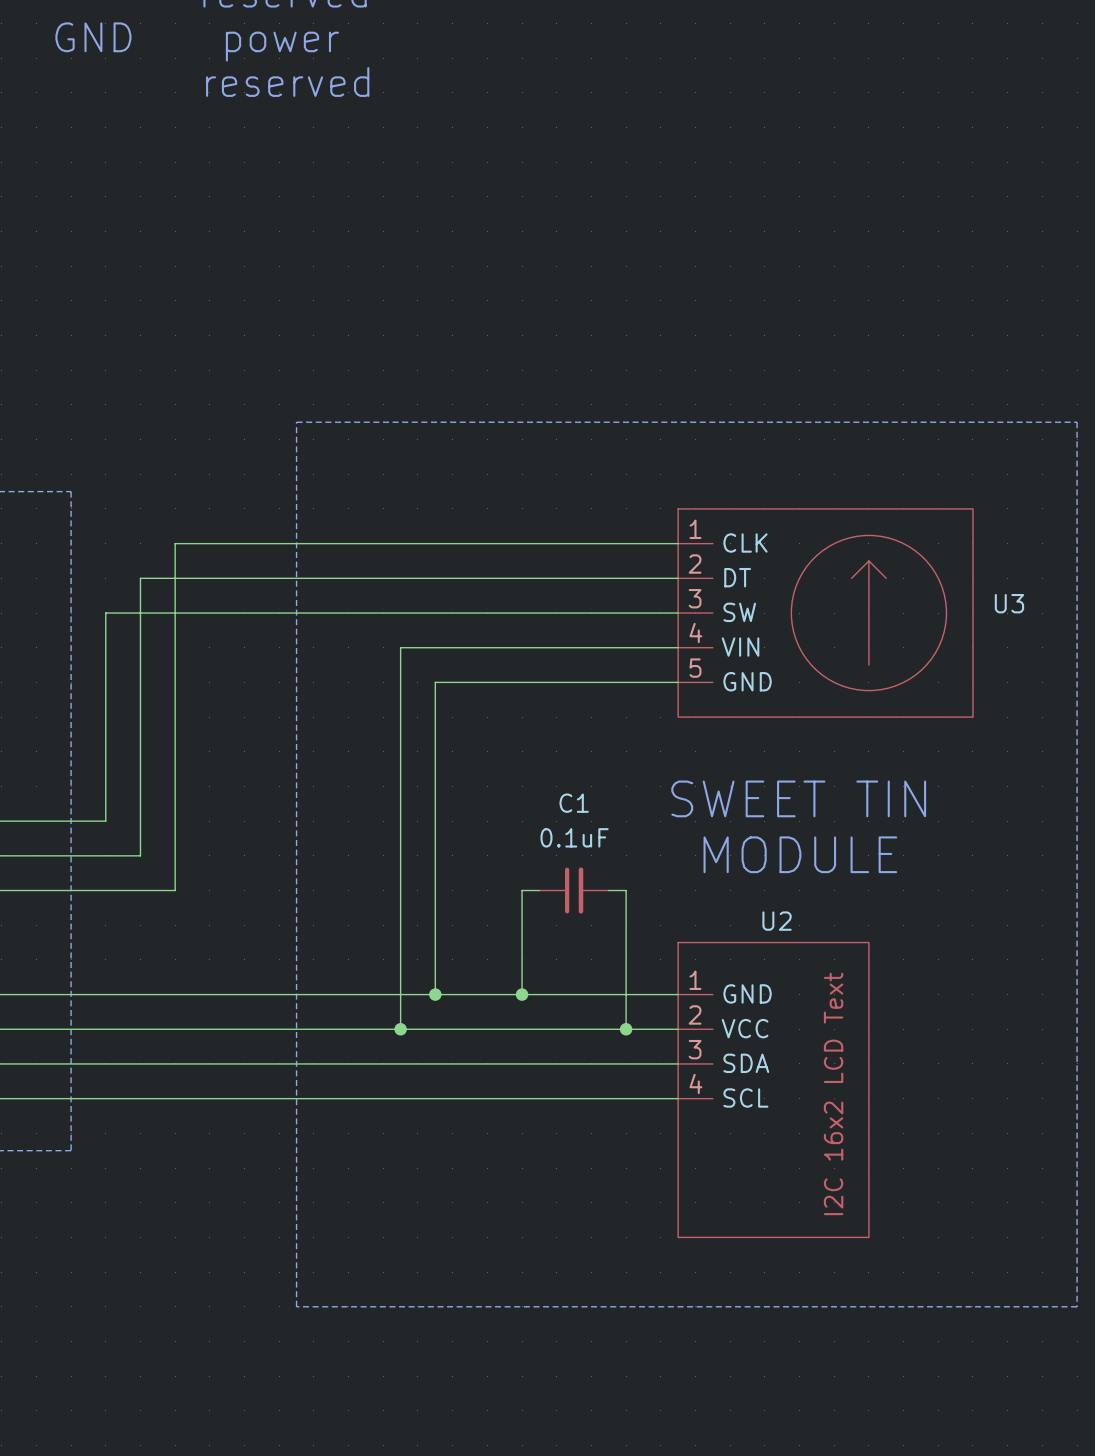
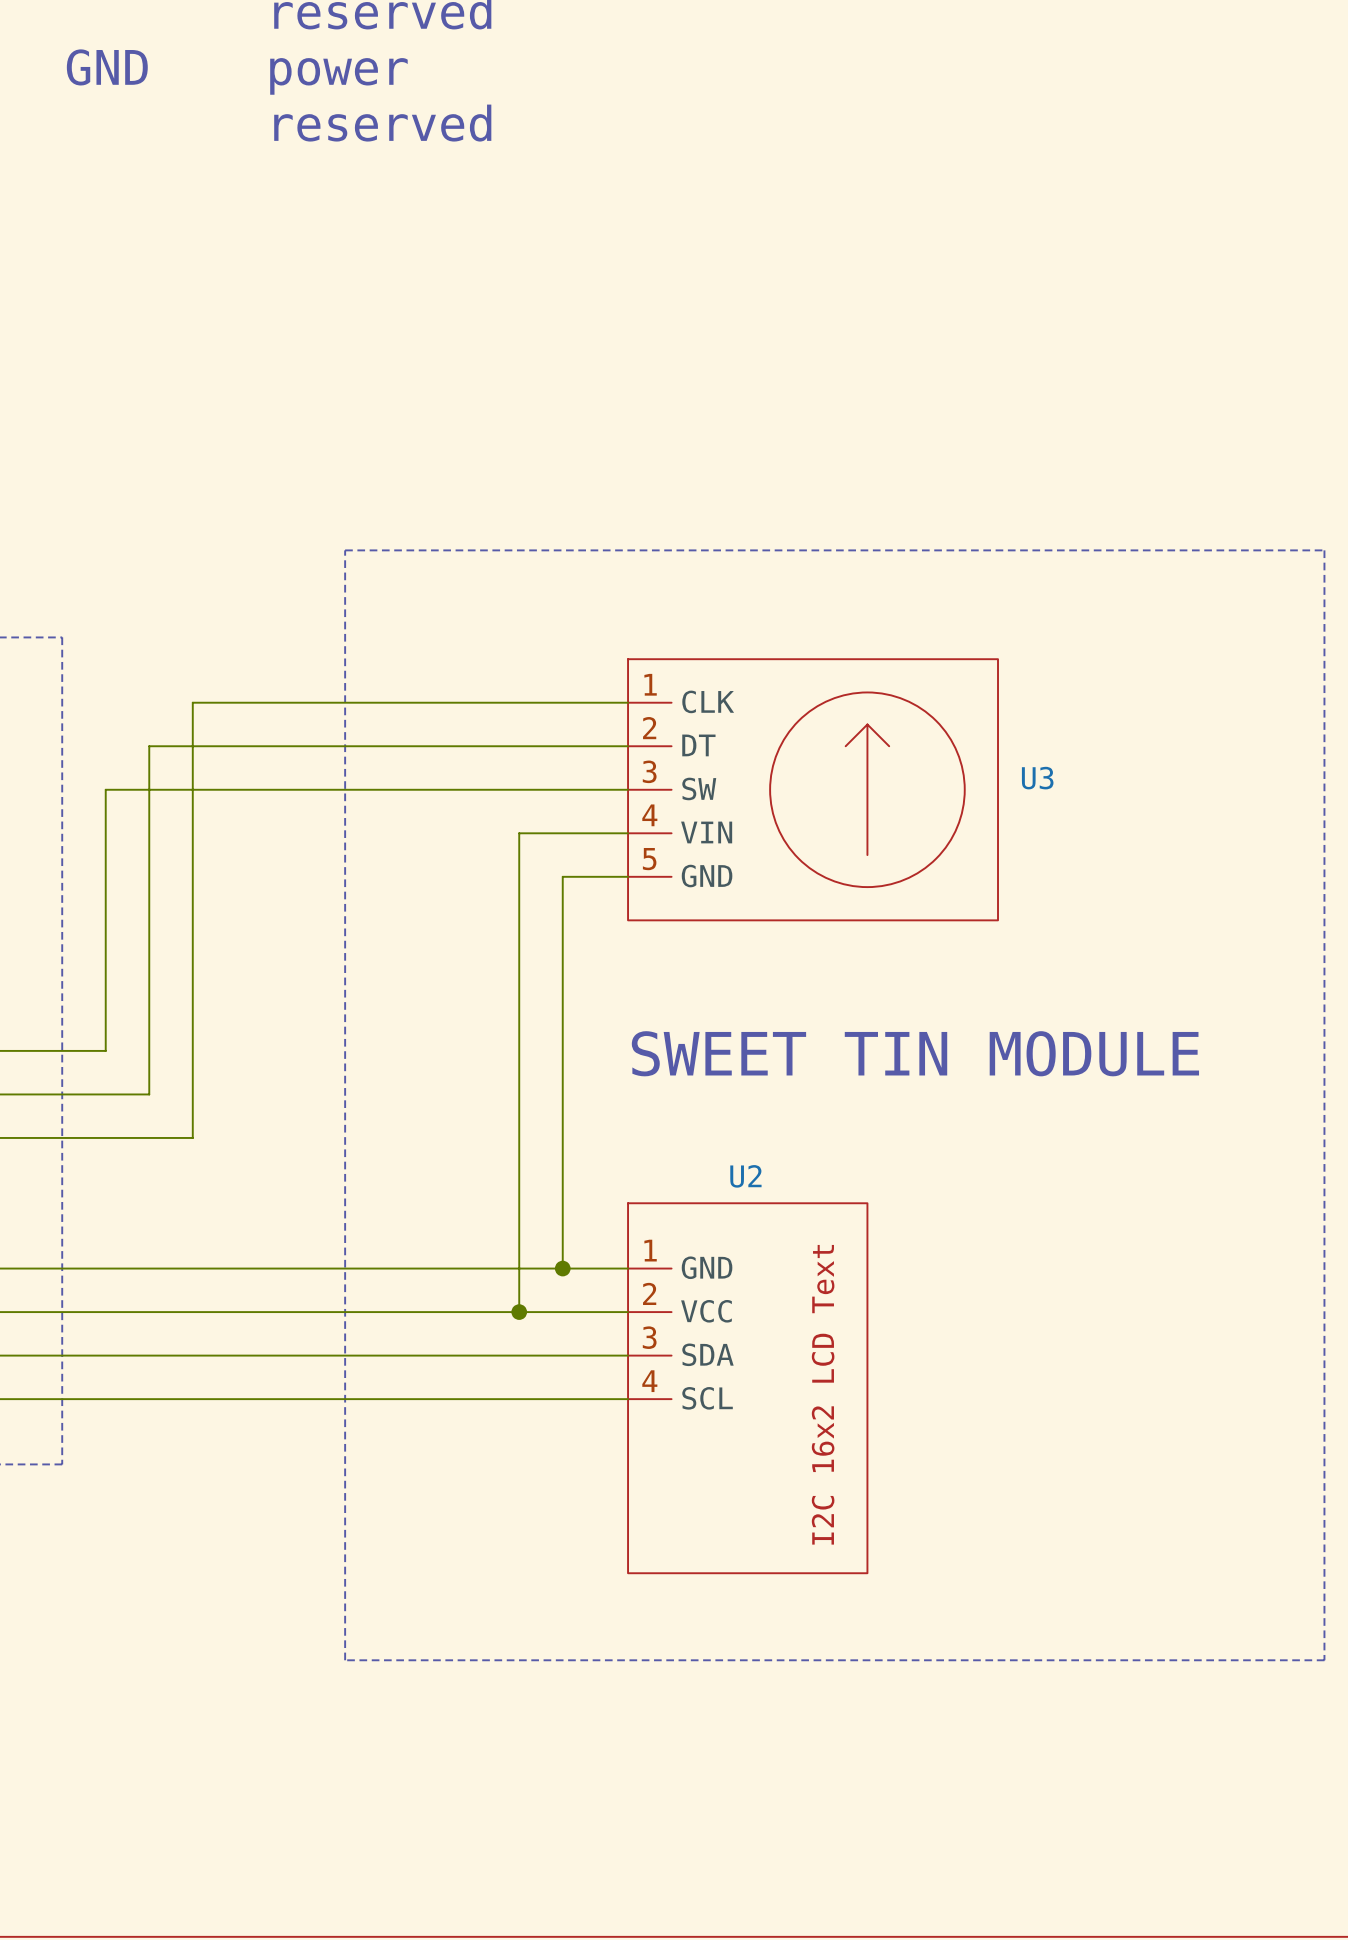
wire: (522, 543) (678, 543) -> none
wire: (522, 578) (678, 578) -> none
wire: (522, 613) (678, 613) -> none
U3 position: (825, 613) -> (813, 789)
wire: (435, 647) (400, 647) (400, 1029) -> none
wire: (522, 647) (678, 647) -> none
wire: (435, 682) (470, 682) -> (519, 876) (519, 833)
wire: none -> (562, 876) (562, 1268)
wire: (522, 682) (678, 682) -> none
text: SWEET TIN (798, 798) -> SWEET TIN MODULE (915, 1053)
text: MODULE (800, 854) -> none
wire: (539, 890) (522, 890) (522, 994) (678, 994) -> none
C1: 0.1uF (574, 890) -> none
wire: (608, 890) (626, 890) (626, 1029) -> none
wire: none -> (519, 1268) (519, 1312)
junction: (435, 994) -> none
junction: none -> (562, 1268)
junction: (522, 994) -> none
junction: (400, 1029) -> none
junction: none -> (519, 1312)
wire: (522, 1029) (678, 1029) -> none
junction: (626, 1029) -> none
wire: (522, 1063) (678, 1063) -> none
U2 position: (773, 1089) -> (747, 1388)
wire: (522, 1098) (678, 1098) -> none

